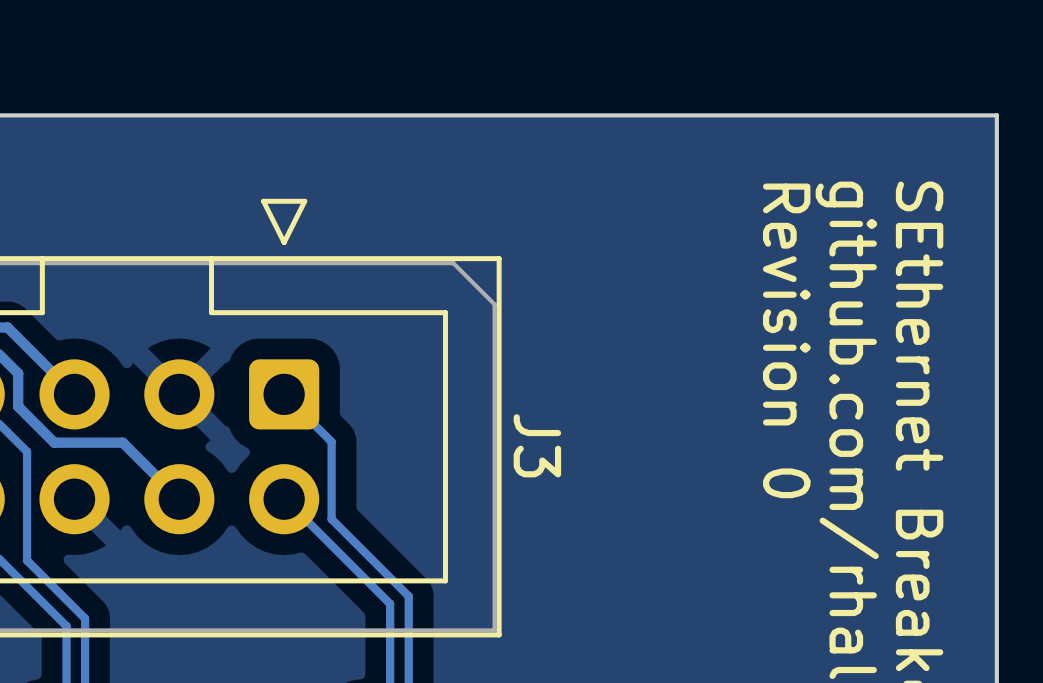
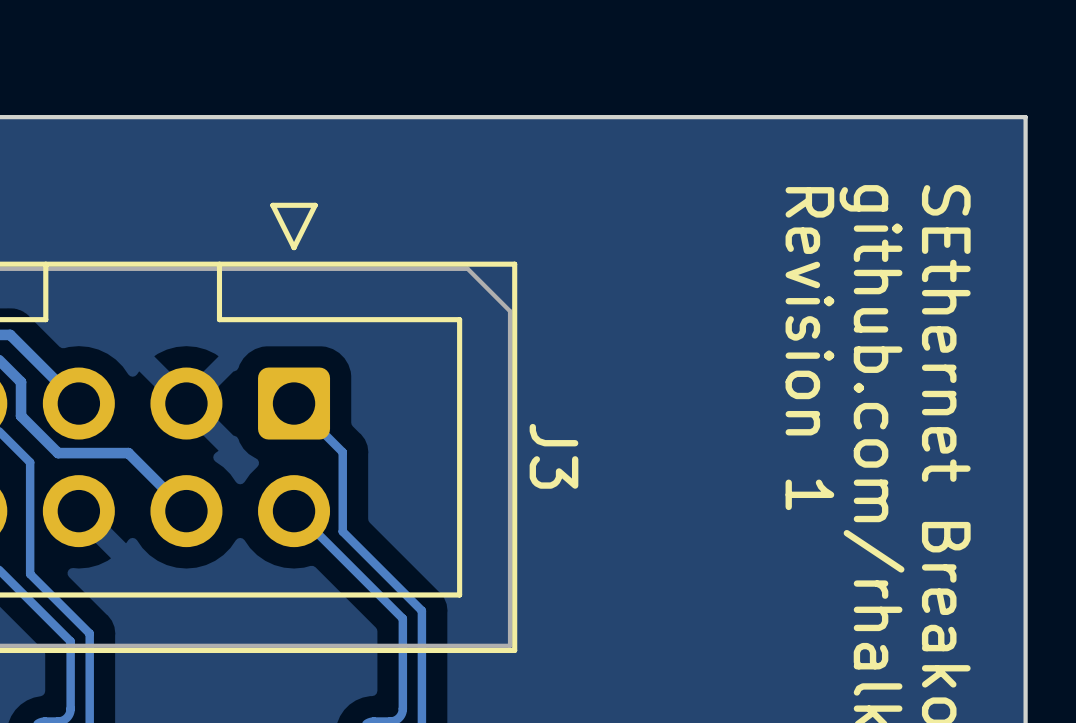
text: Revision 0 (786, 340) -> Revision 1 (809, 348)

